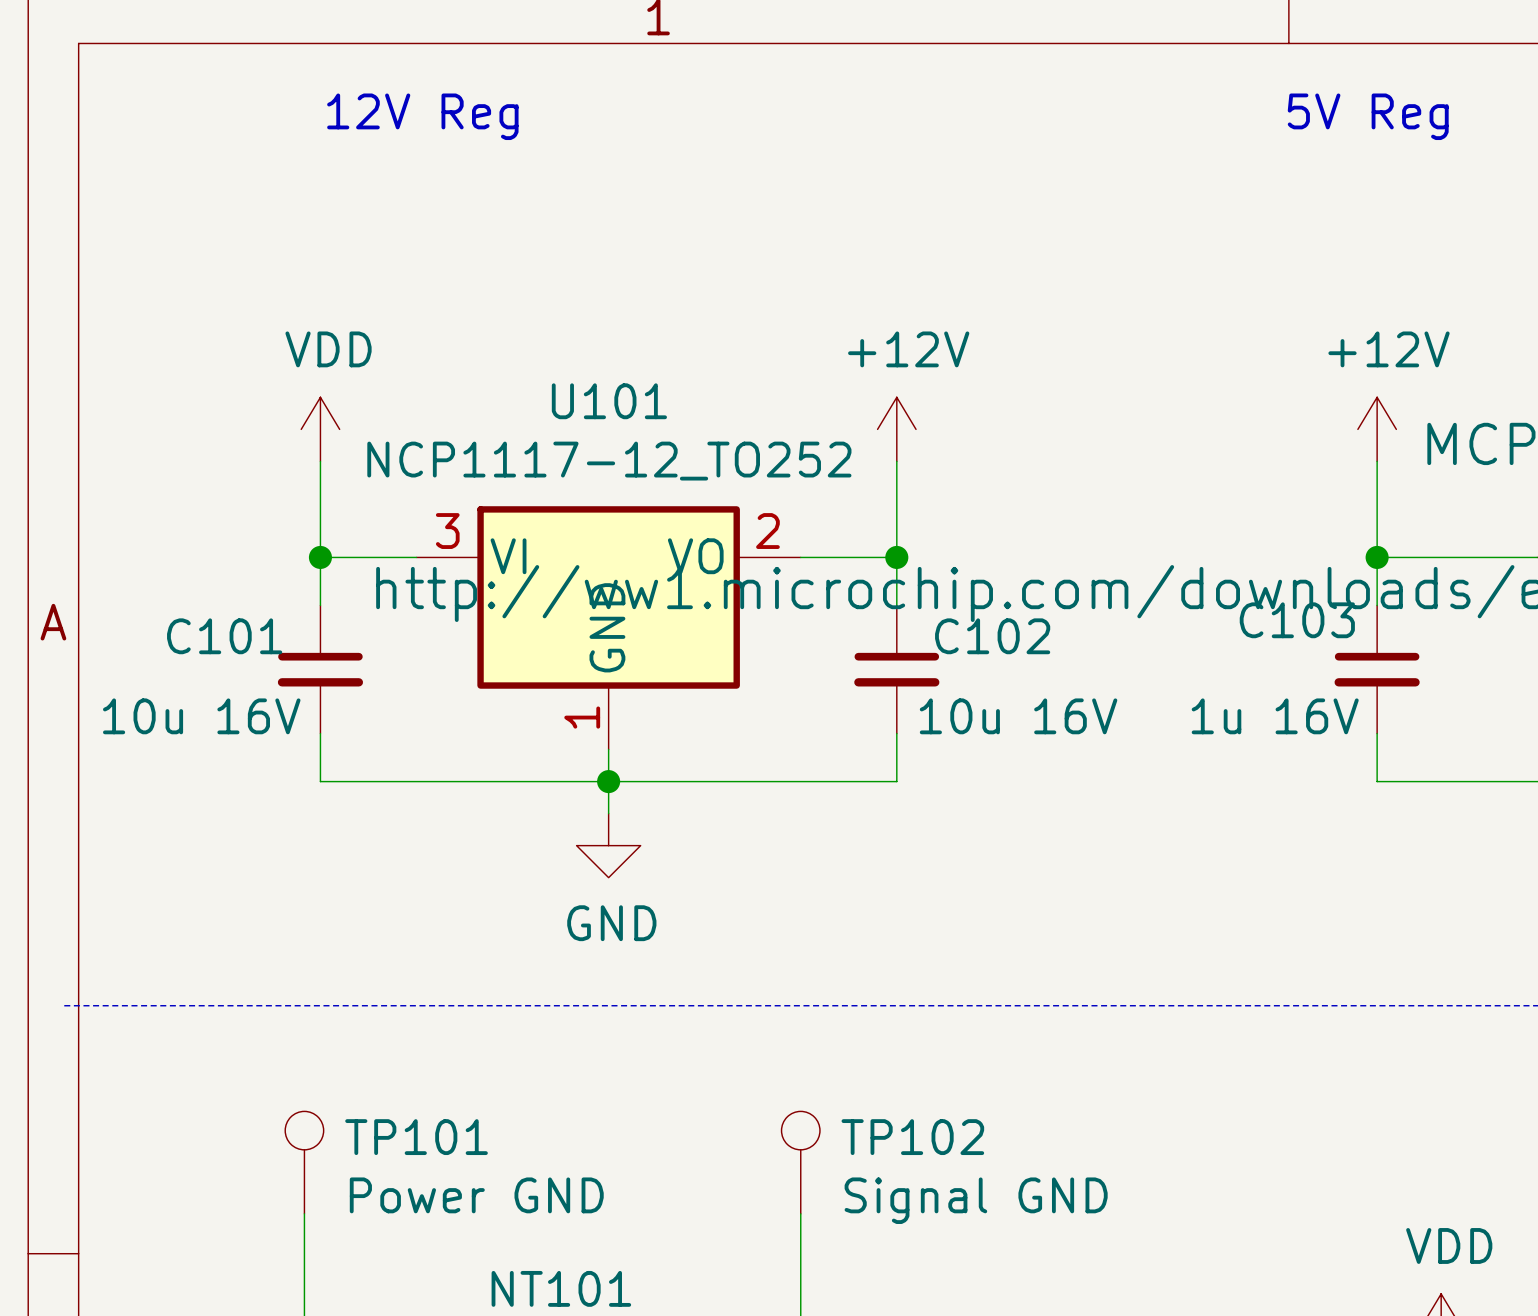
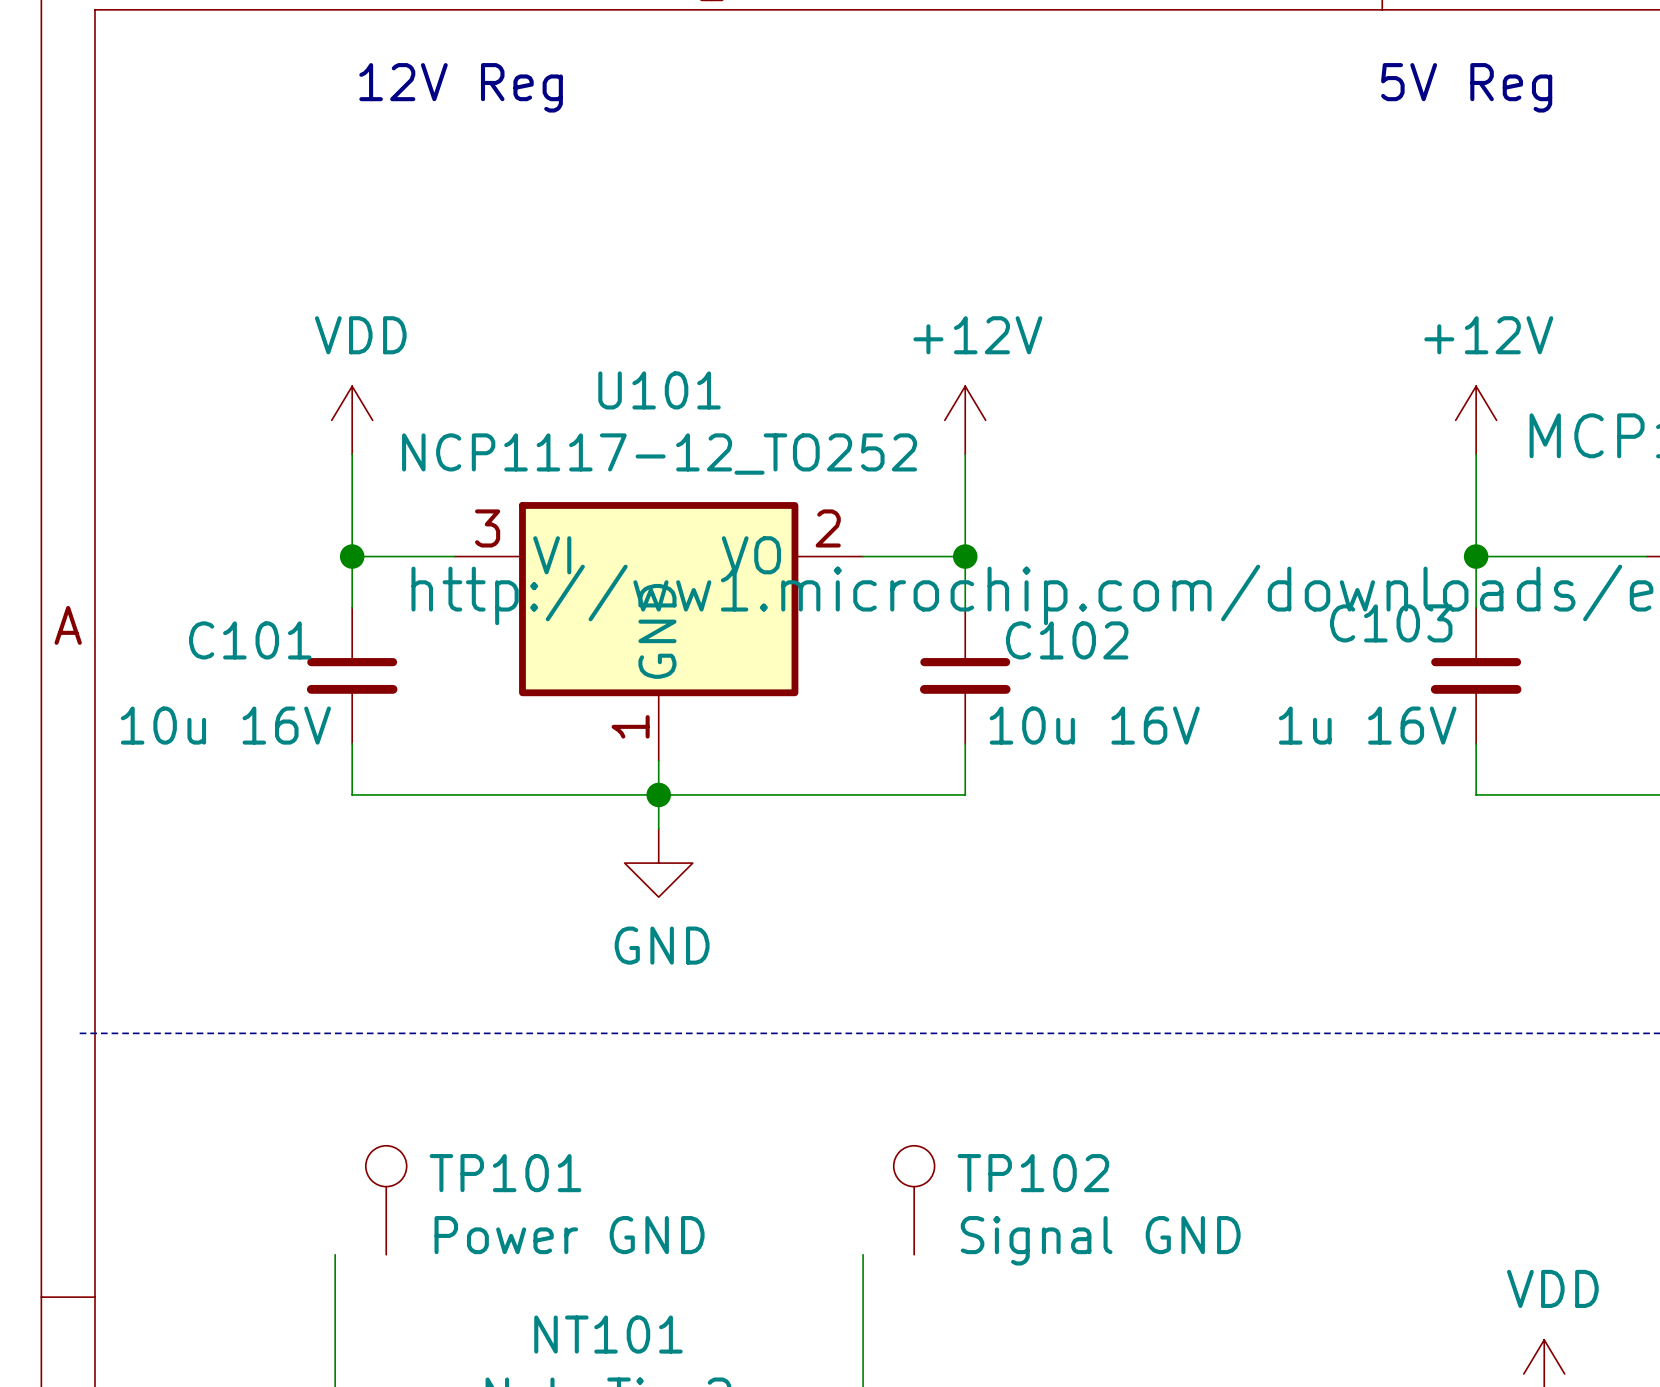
TP101 position: (304, 1162) -> (386, 1200)
TP102 position: (800, 1162) -> (914, 1200)

